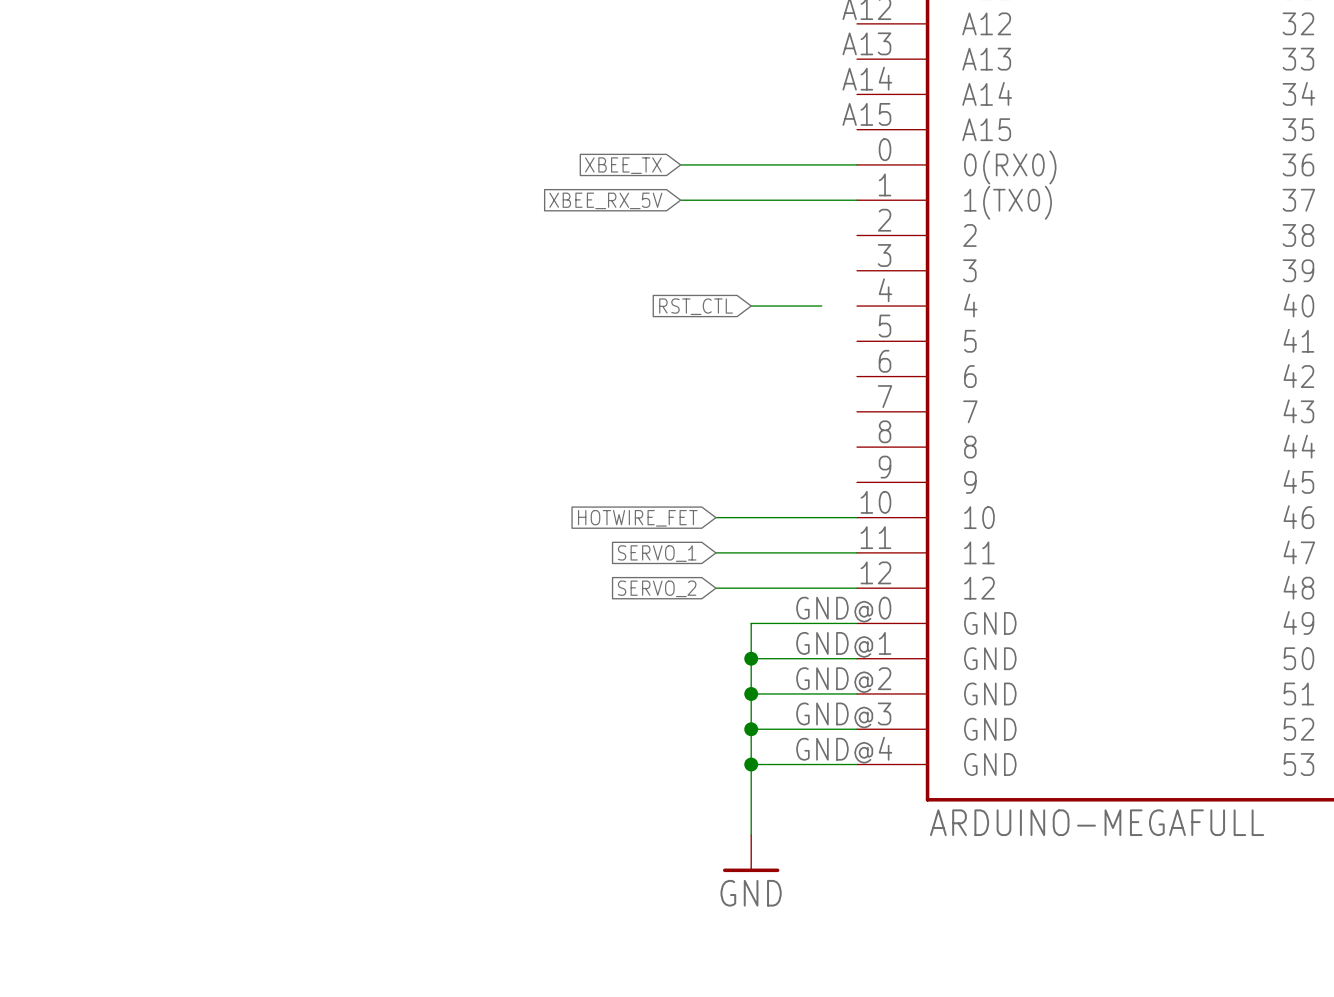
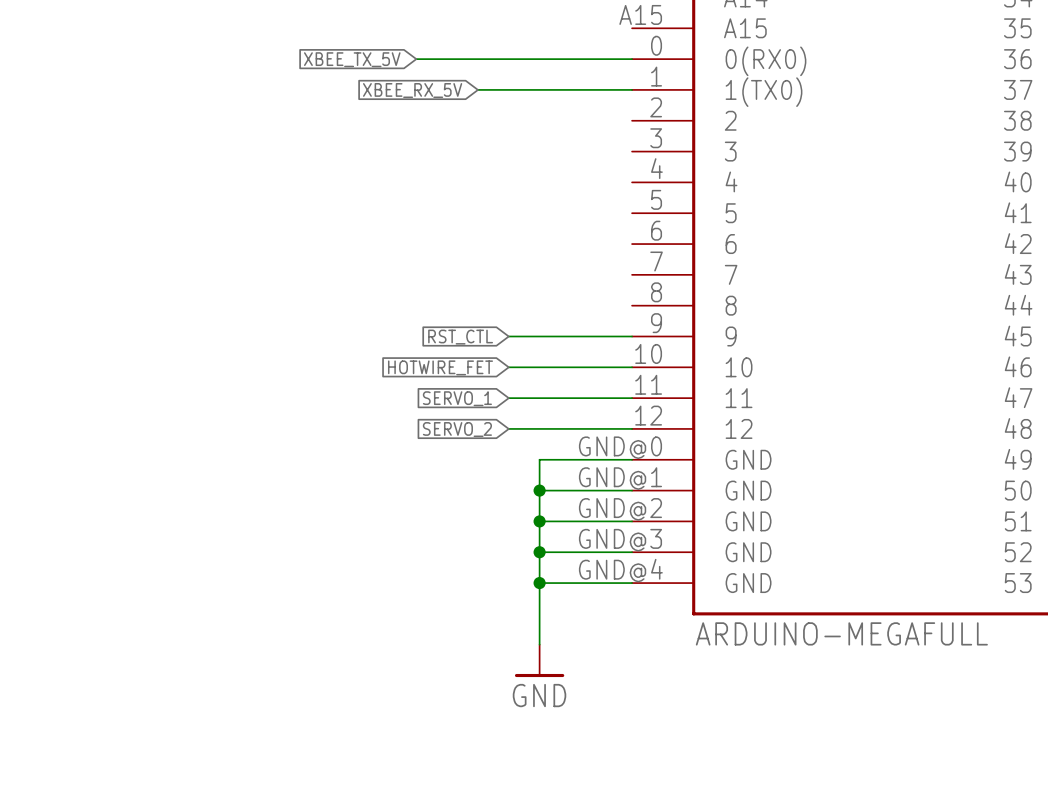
global label: XBEE_TX (623, 165) -> XBEE_TX_5V (352, 59)
global label position: RST_CTL (696, 306) -> RST_CTL (460, 337)
wire: (751, 306) (821, 306) -> (416, 59) (477, 59)
wire: none -> (508, 336) (632, 336)

